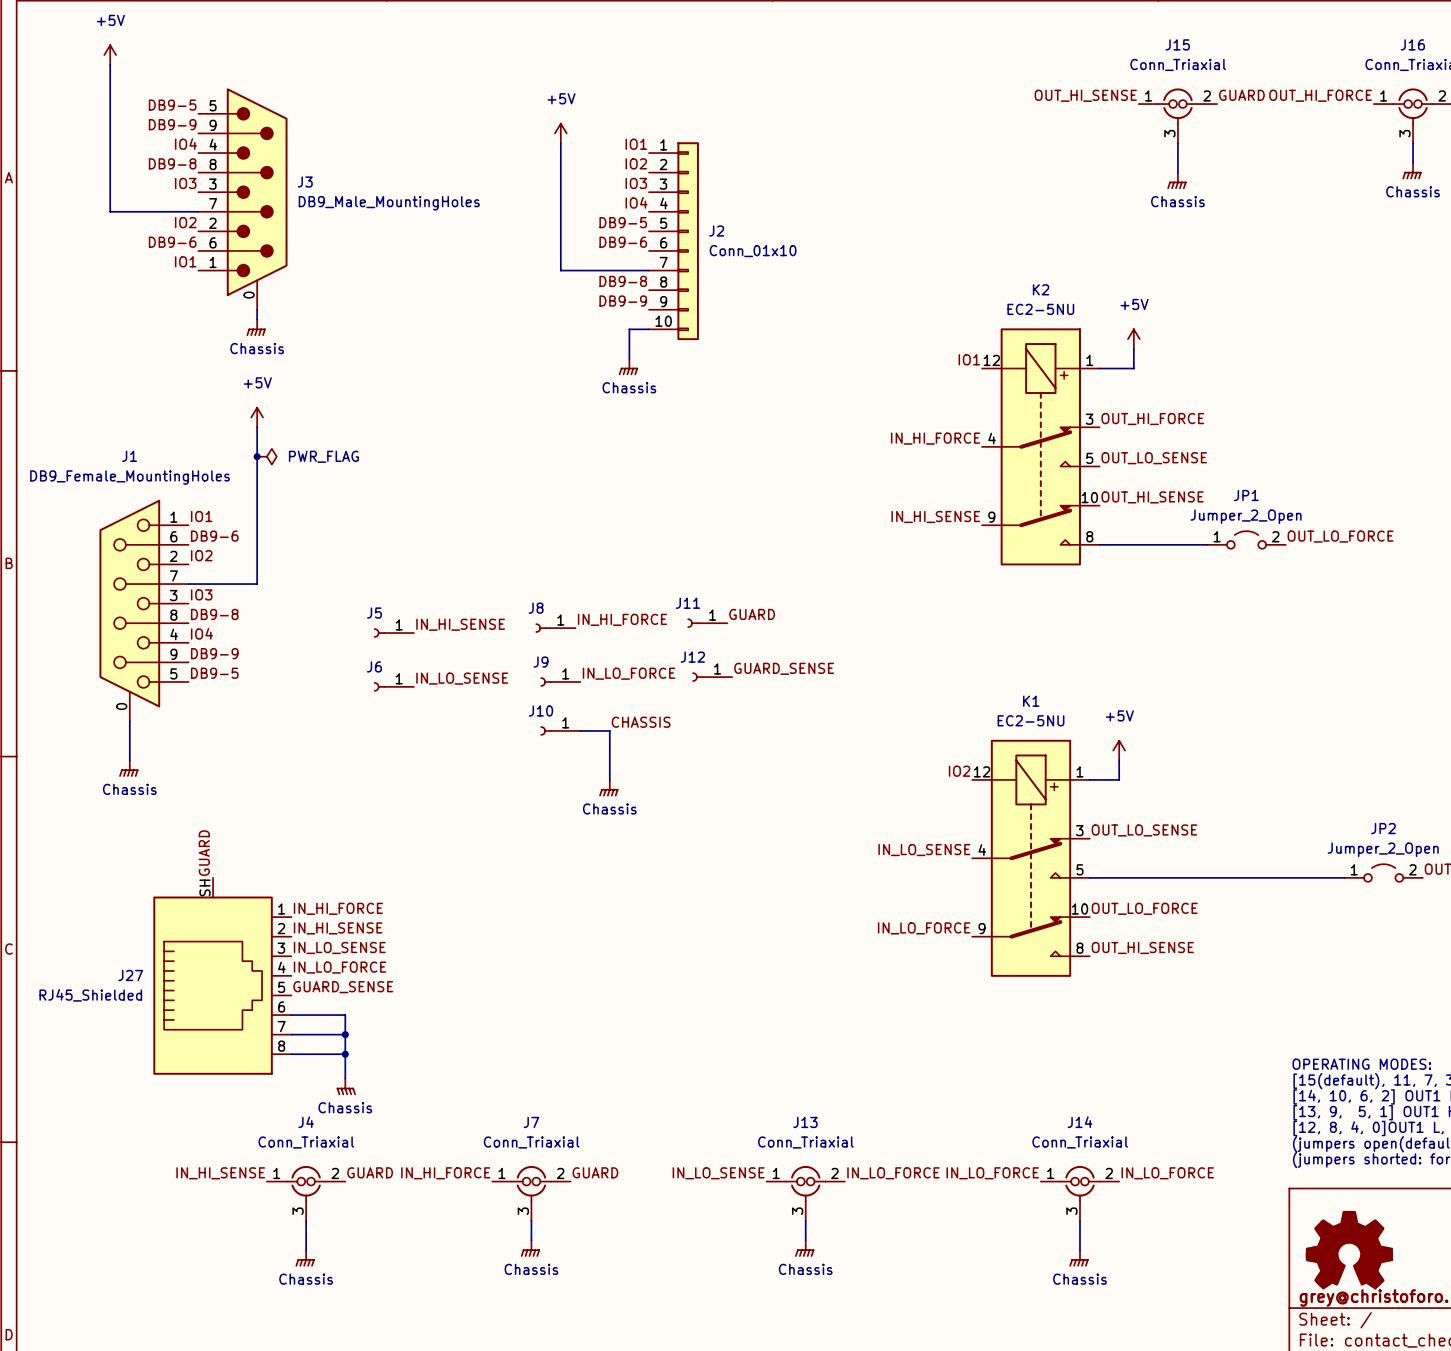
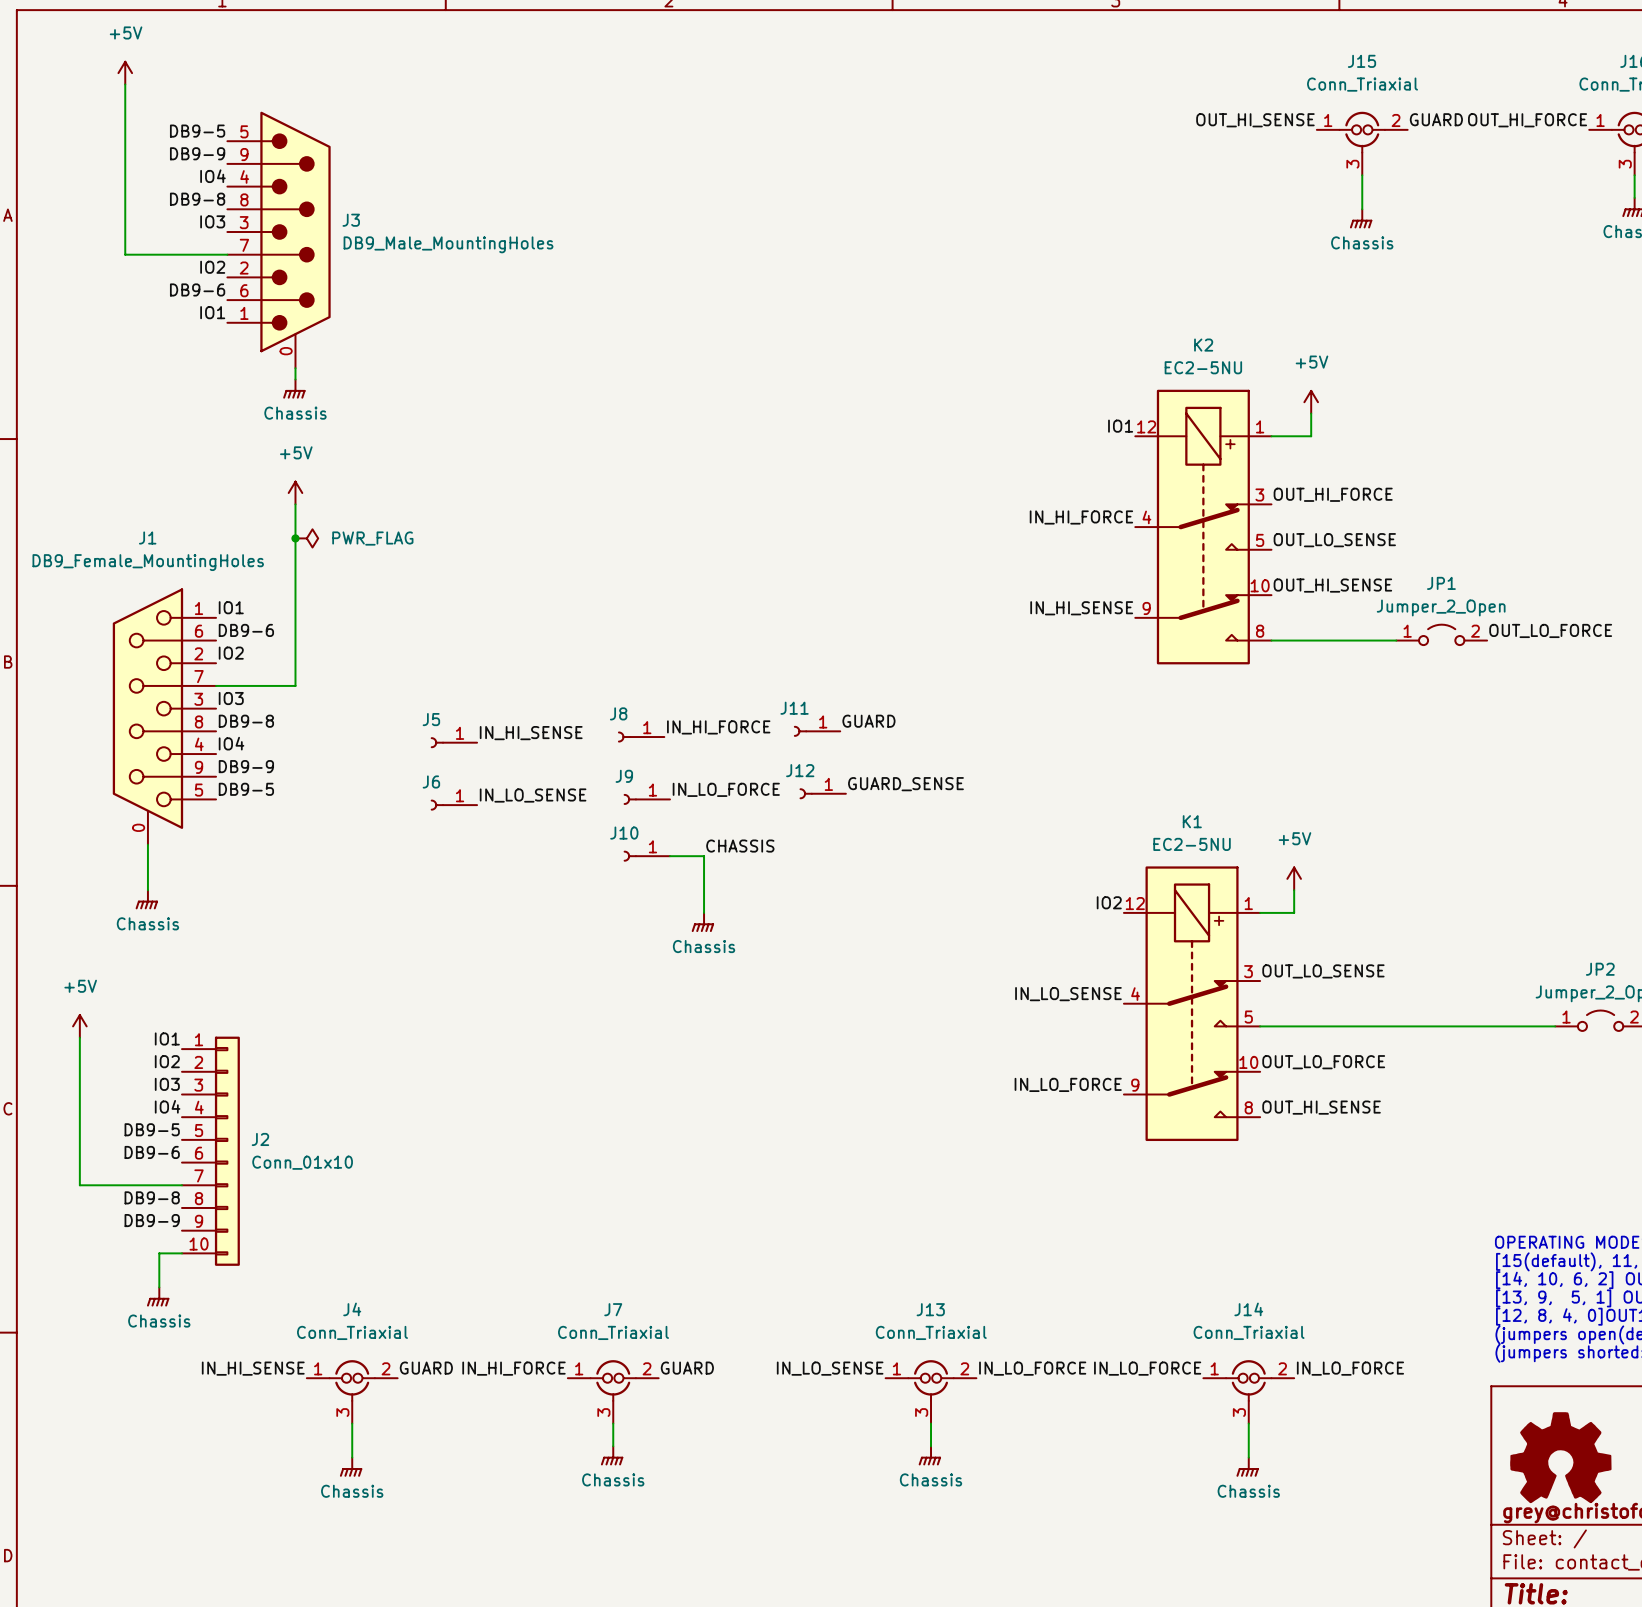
power symbol: +5V (560, 133) -> none
wire: (560, 143) (560, 270) (648, 270) -> none
label: IO1 (636, 144) -> none
label: IO2 (636, 163) -> none
label: IO3 (636, 183) -> none
label: IO4 (636, 202) -> none
label: DB9-5 (623, 222) -> none
J2 position: (673, 241) -> (210, 1151)
label: DB9-6 (623, 242) -> none
label: DB9-8 (623, 281) -> none
label: DB9-9 (623, 301) -> none
wire: (648, 329) (629, 329) (629, 358) -> none
power symbol: (628, 366) -> none
label: GUARD (204, 853) -> none
power symbol: none -> +5V (79, 1026)
wire: none -> (79, 1037) (79, 1185) (182, 1185)
label: none -> IO1 (167, 1038)
label: none -> IO2 (167, 1061)
label: IN_HI_FORCE (338, 908) -> none
label: none -> IO3 (167, 1084)
label: IN_HI_SENSE (338, 928) -> none
label: none -> IO4 (167, 1106)
label: IN_LO_SENSE (339, 947) -> none
label: none -> DB9-5 (152, 1129)
label: IN_LO_FORCE (340, 967) -> none
J27: RJ45_Shielded (222, 976) -> none
label: none -> DB9-6 (152, 1152)
label: GUARD_SENSE (343, 987) -> none
wire: (291, 1015) (345, 1015) (345, 1078) -> none
label: none -> DB9-8 (152, 1197)
wire: (291, 1034) (345, 1034) -> none
junction: (345, 1034) -> none
label: none -> DB9-9 (152, 1220)
wire: (291, 1054) (345, 1054) -> none
junction: (345, 1054) -> none
wire: none -> (182, 1253) (159, 1253) (159, 1287)
power symbol: (346, 1086) -> none
power symbol: none -> (158, 1296)

